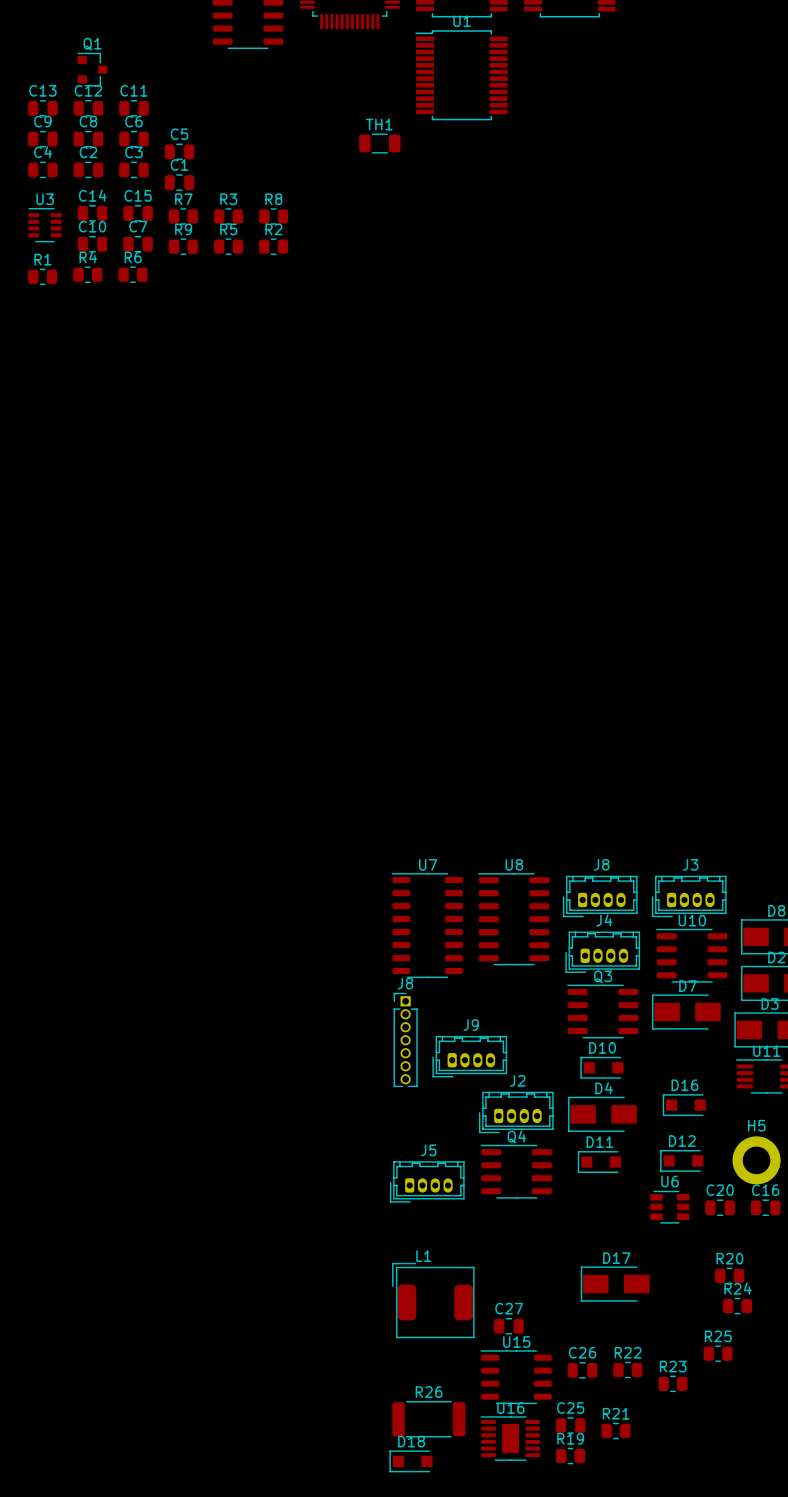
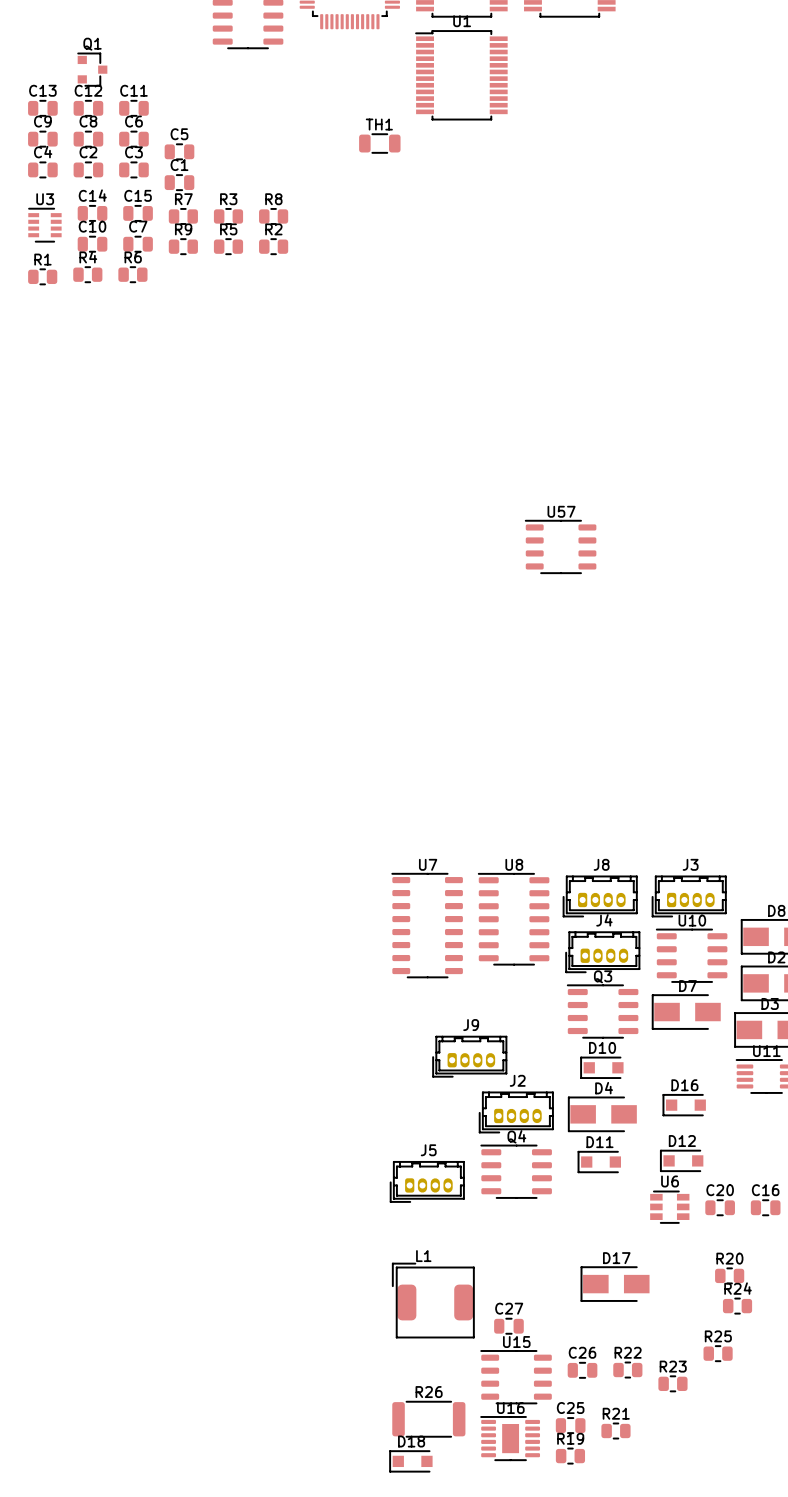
U57: none -> (560, 546)
J8: (405, 1039) -> none
H5: (756, 1160) -> none

